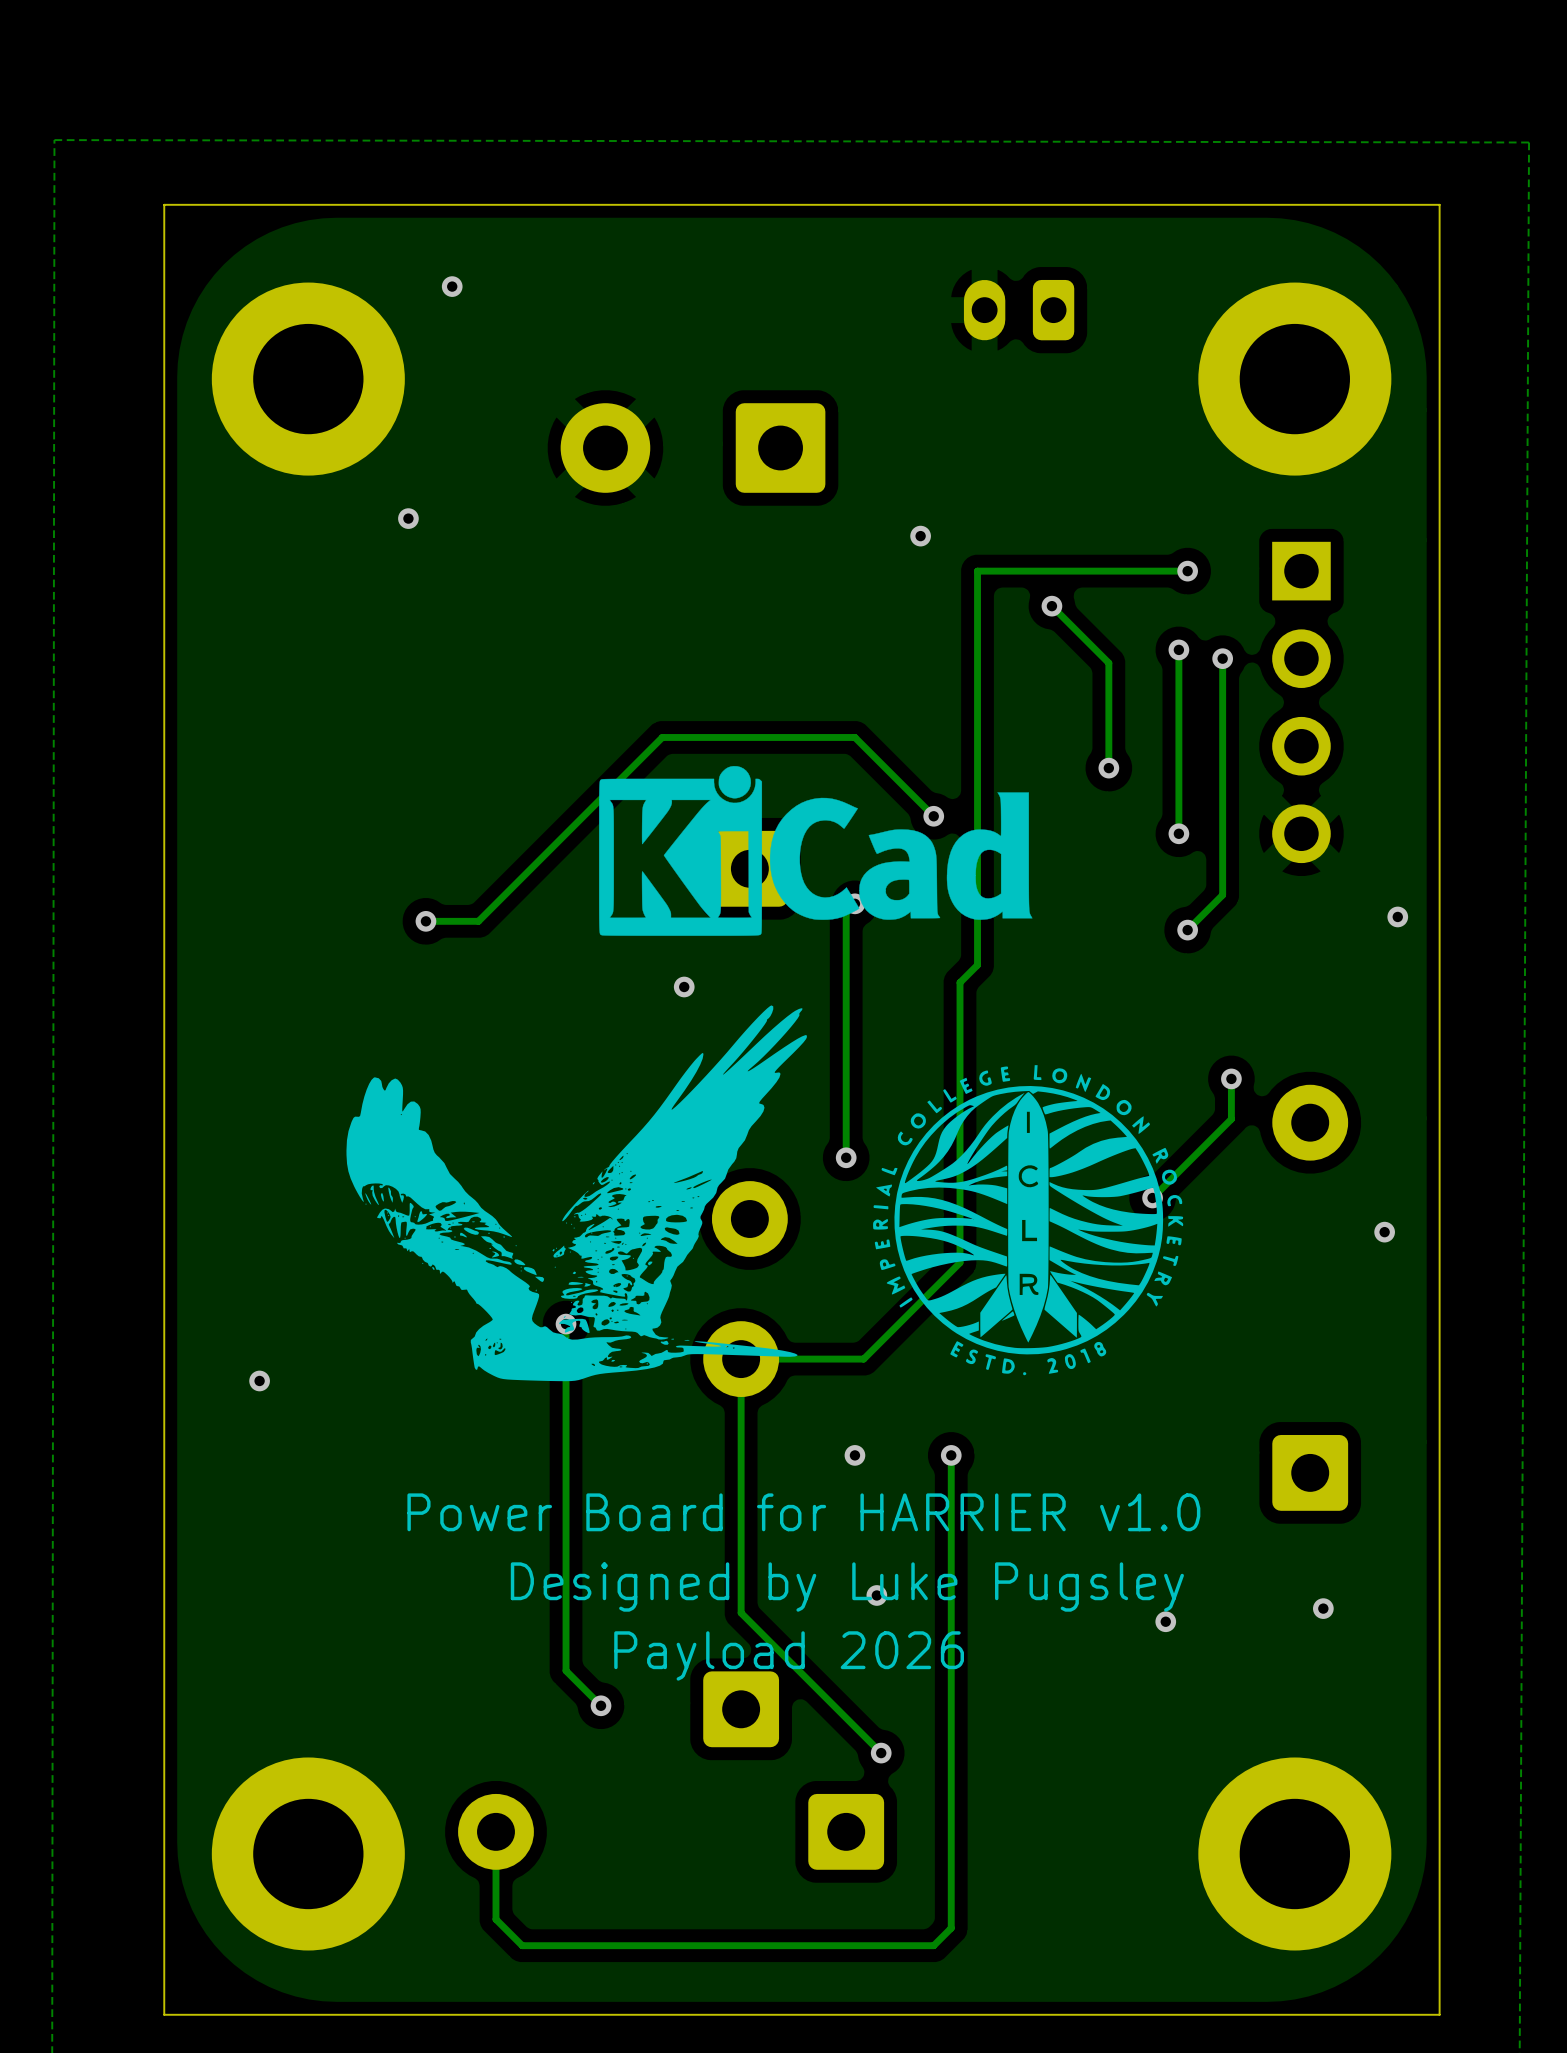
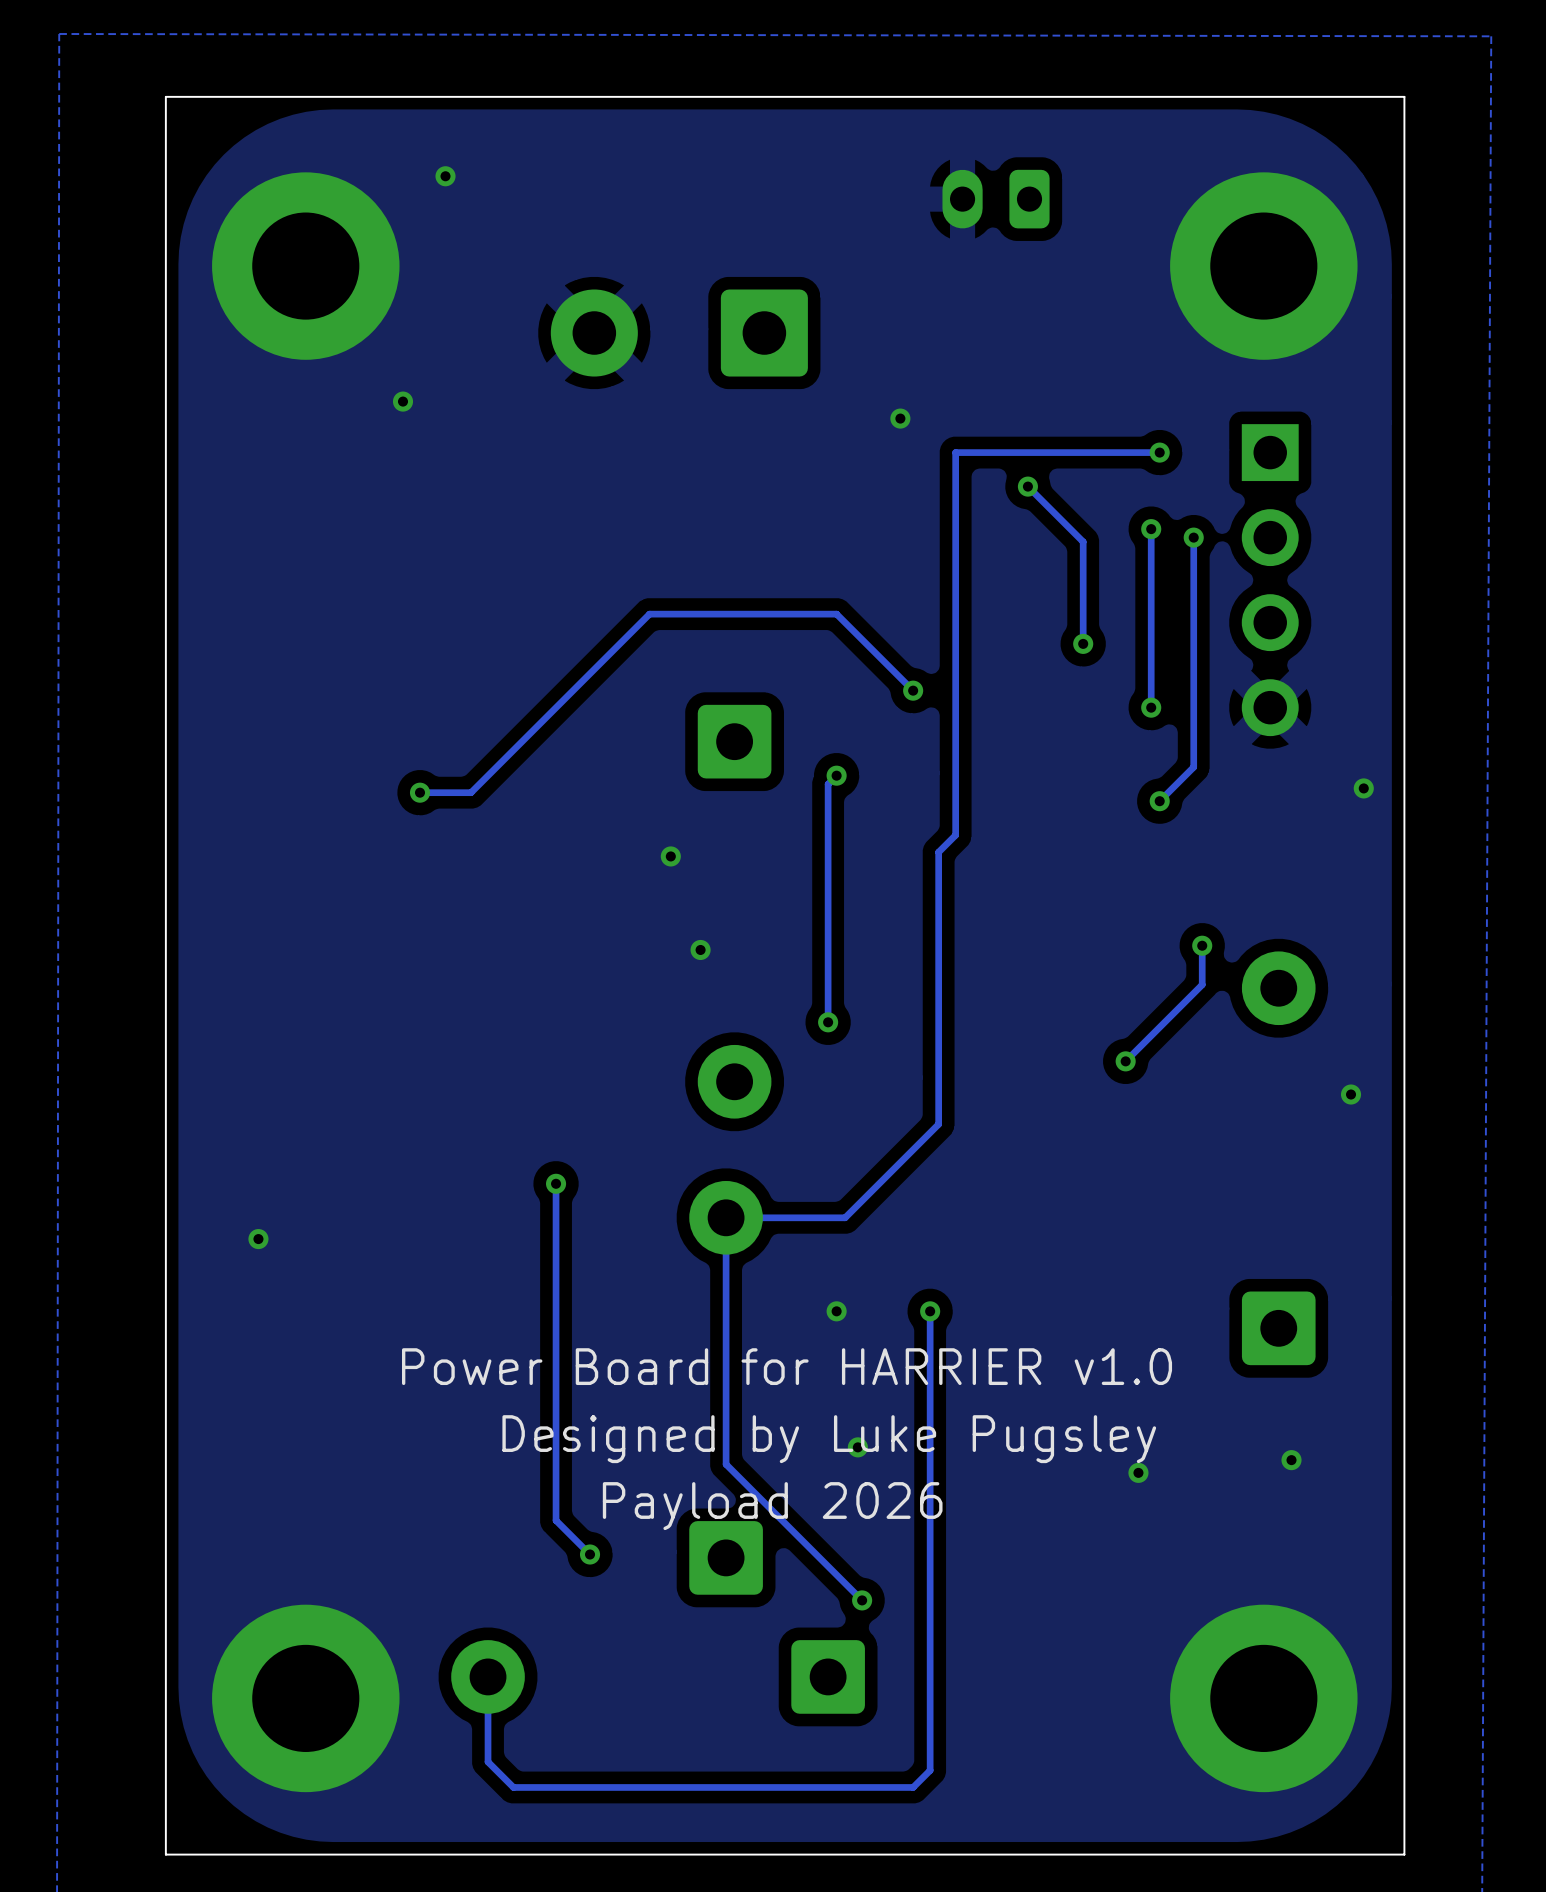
drawing: [599, 766, 1033, 936] -> none
drawing: [346, 1005, 807, 1382] -> none
drawing: [873, 1065, 1184, 1376] -> none

